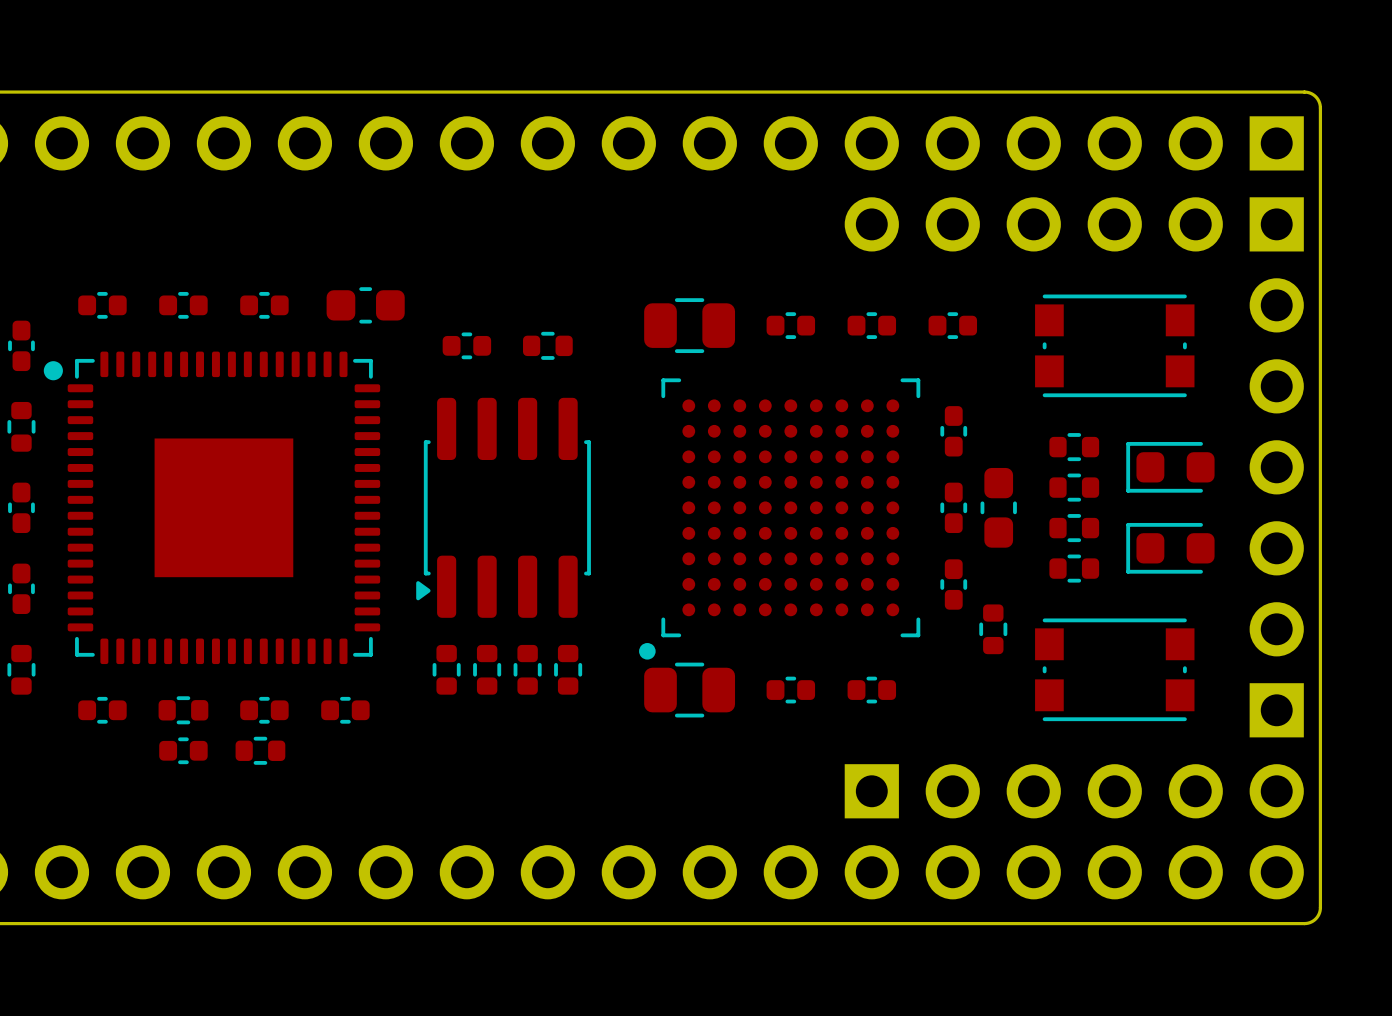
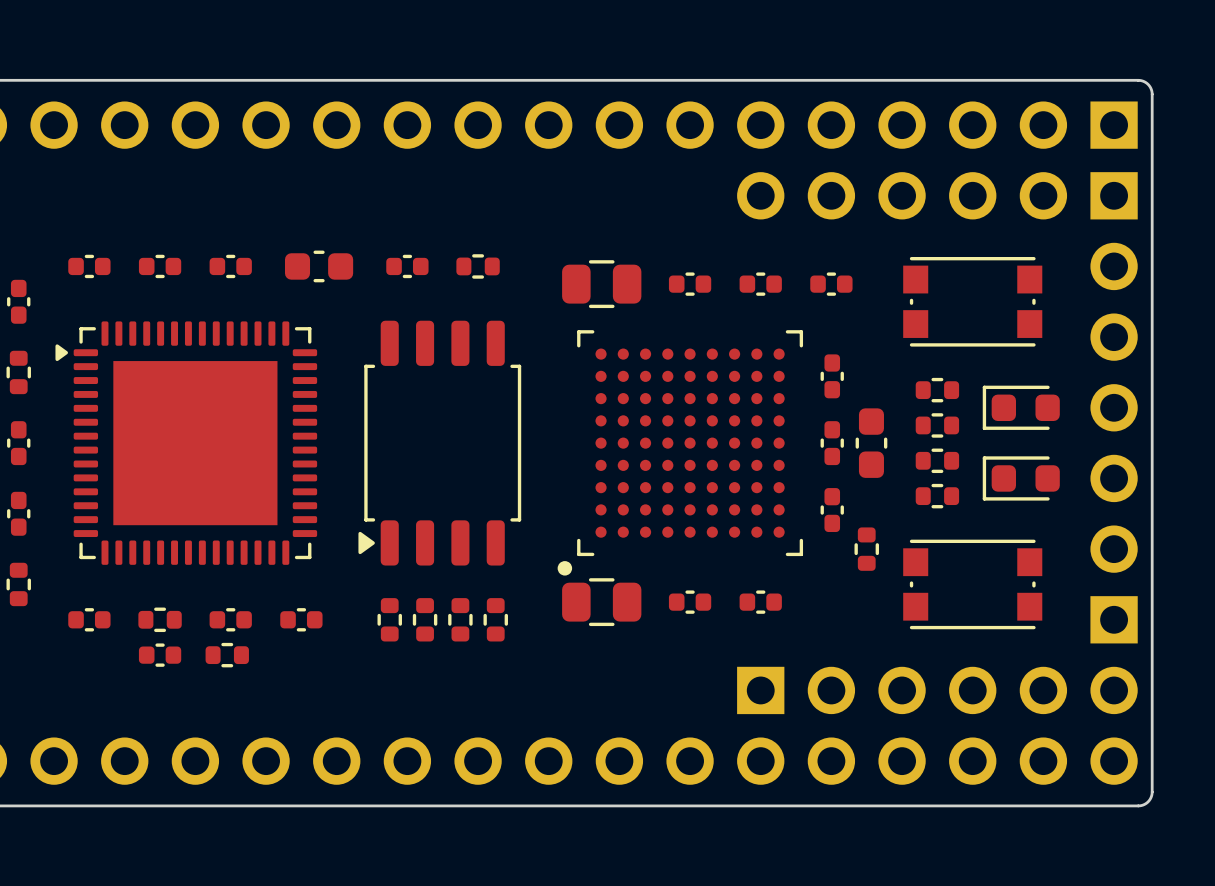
part position: (466, 345) -> (407, 266)
part position: (547, 345) -> (478, 266)
part footprint: [43, 351, 381, 665] -> [55, 321, 318, 565]
part footprint: [416, 397, 591, 618] -> [358, 320, 522, 566]
part: (446, 669) -> none
part: (487, 669) -> none
part: (527, 669) -> none
part: (568, 669) -> none
part: none -> (389, 619)
part: none -> (425, 619)
part: none -> (460, 619)
part: none -> (495, 619)

